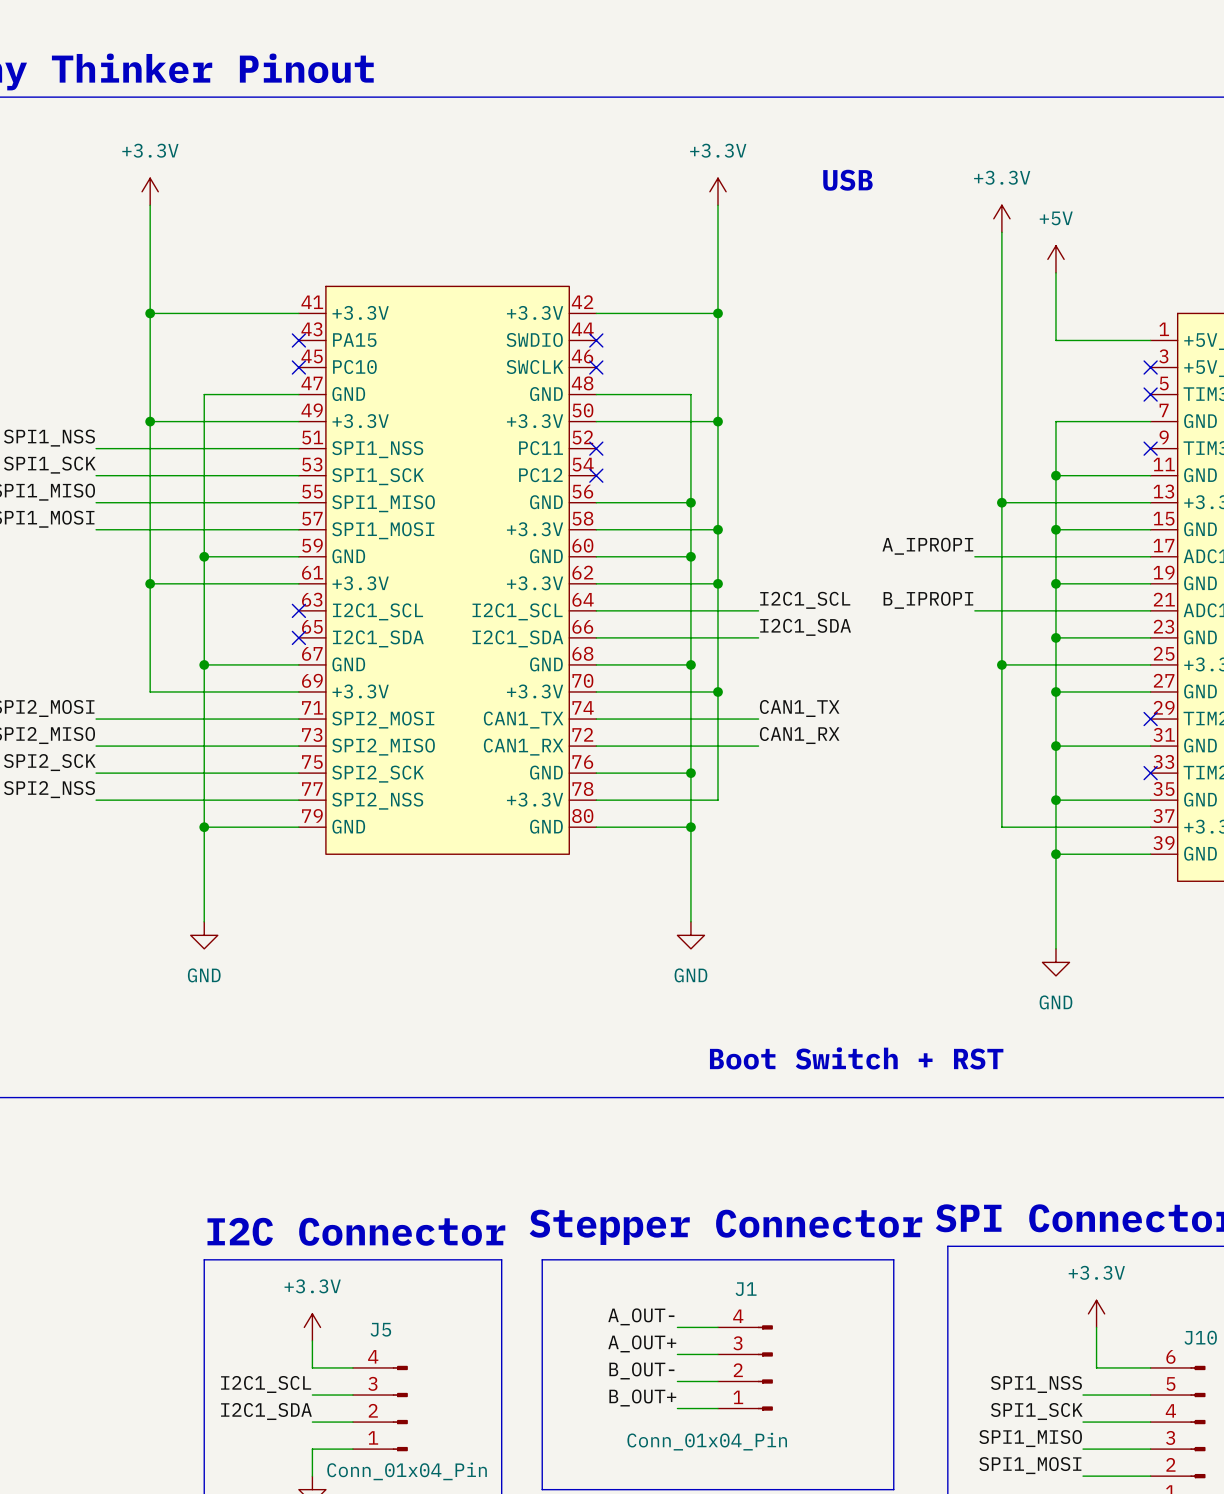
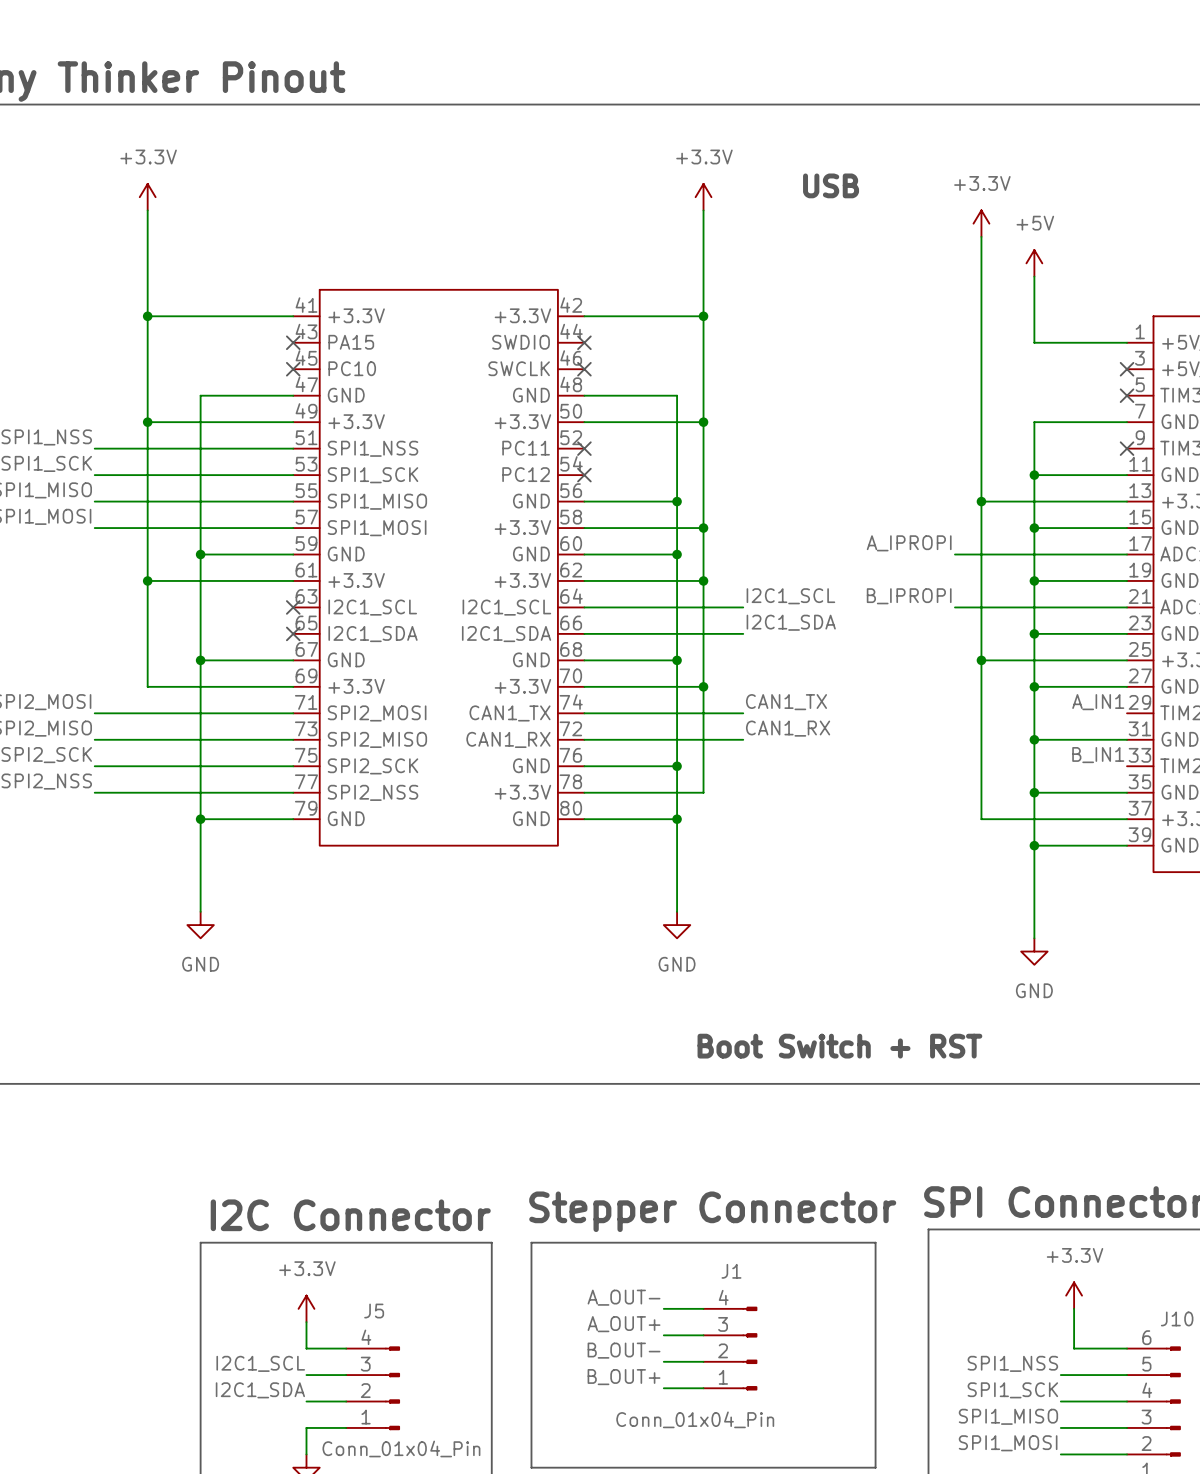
label: none -> A_IN1 (1098, 702)
no-connect mark: (1150, 719) -> none
label: none -> B_IN1 (1098, 755)
no-connect mark: (1150, 773) -> none

